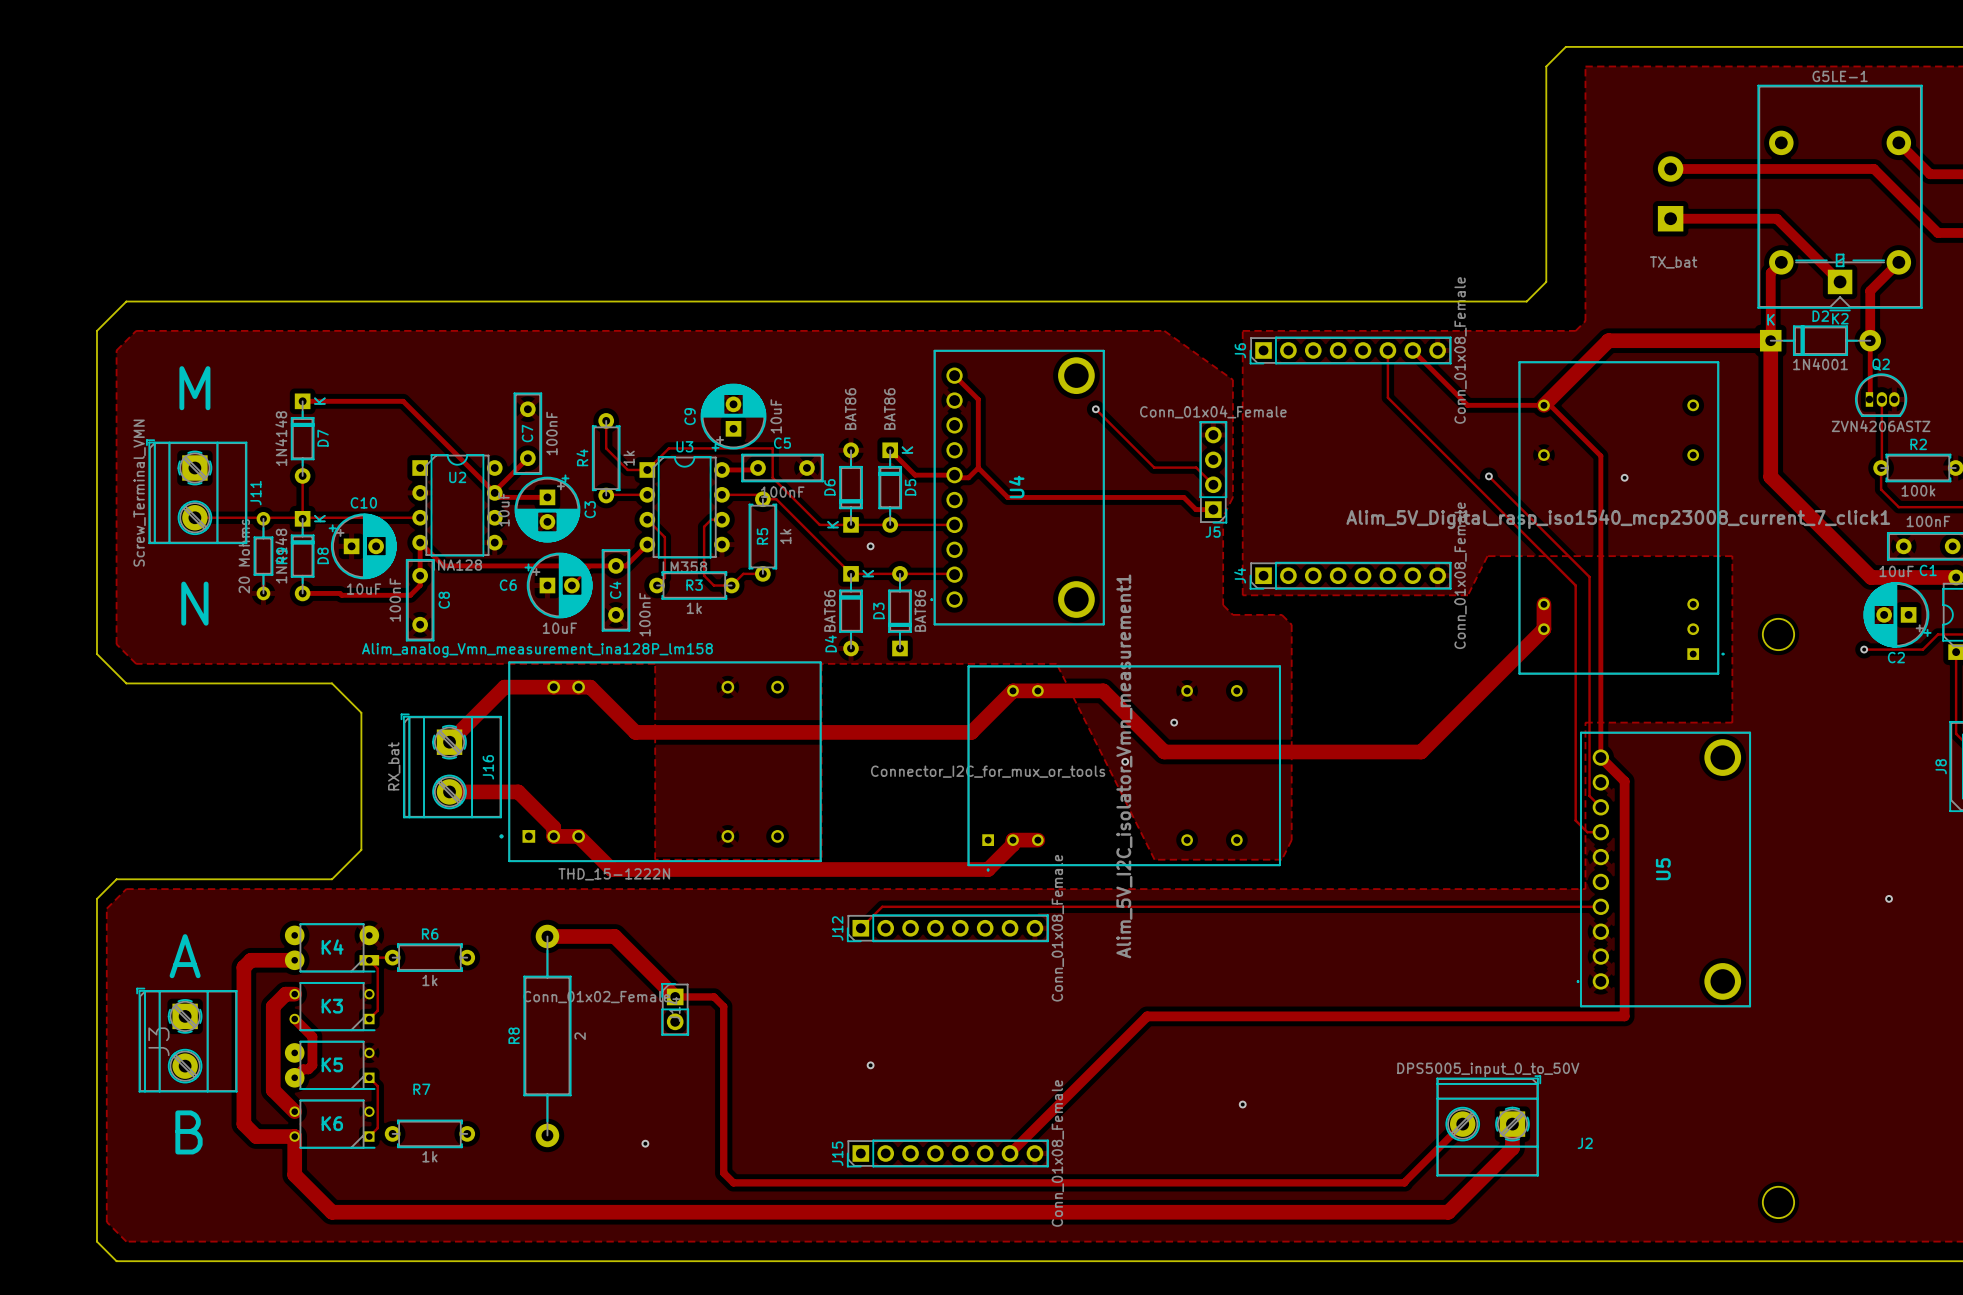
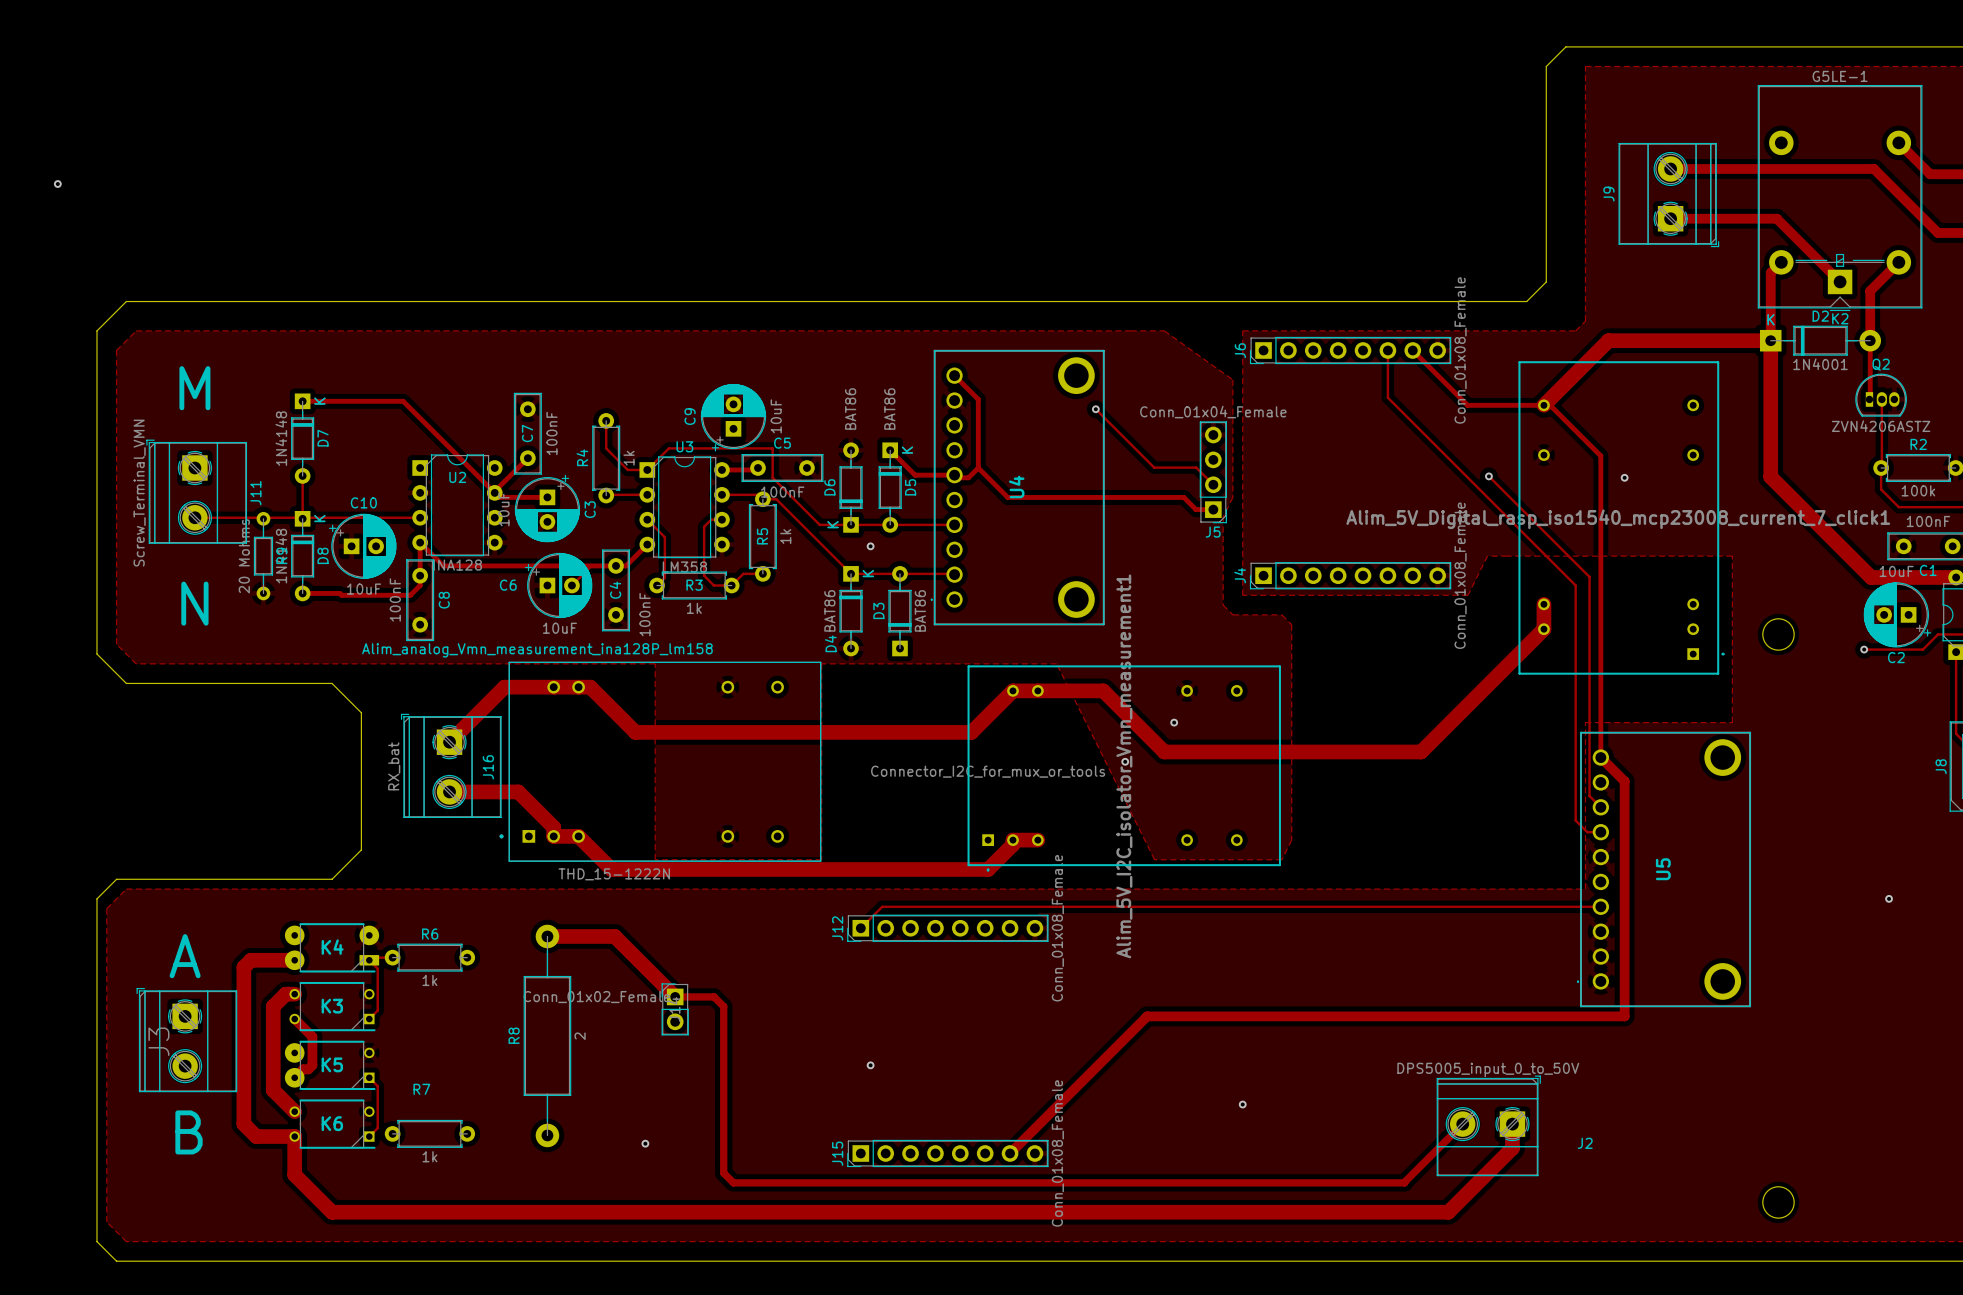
via: none -> (57, 184)
J9 side: bottom (1670, 193) -> top (1668, 195)

